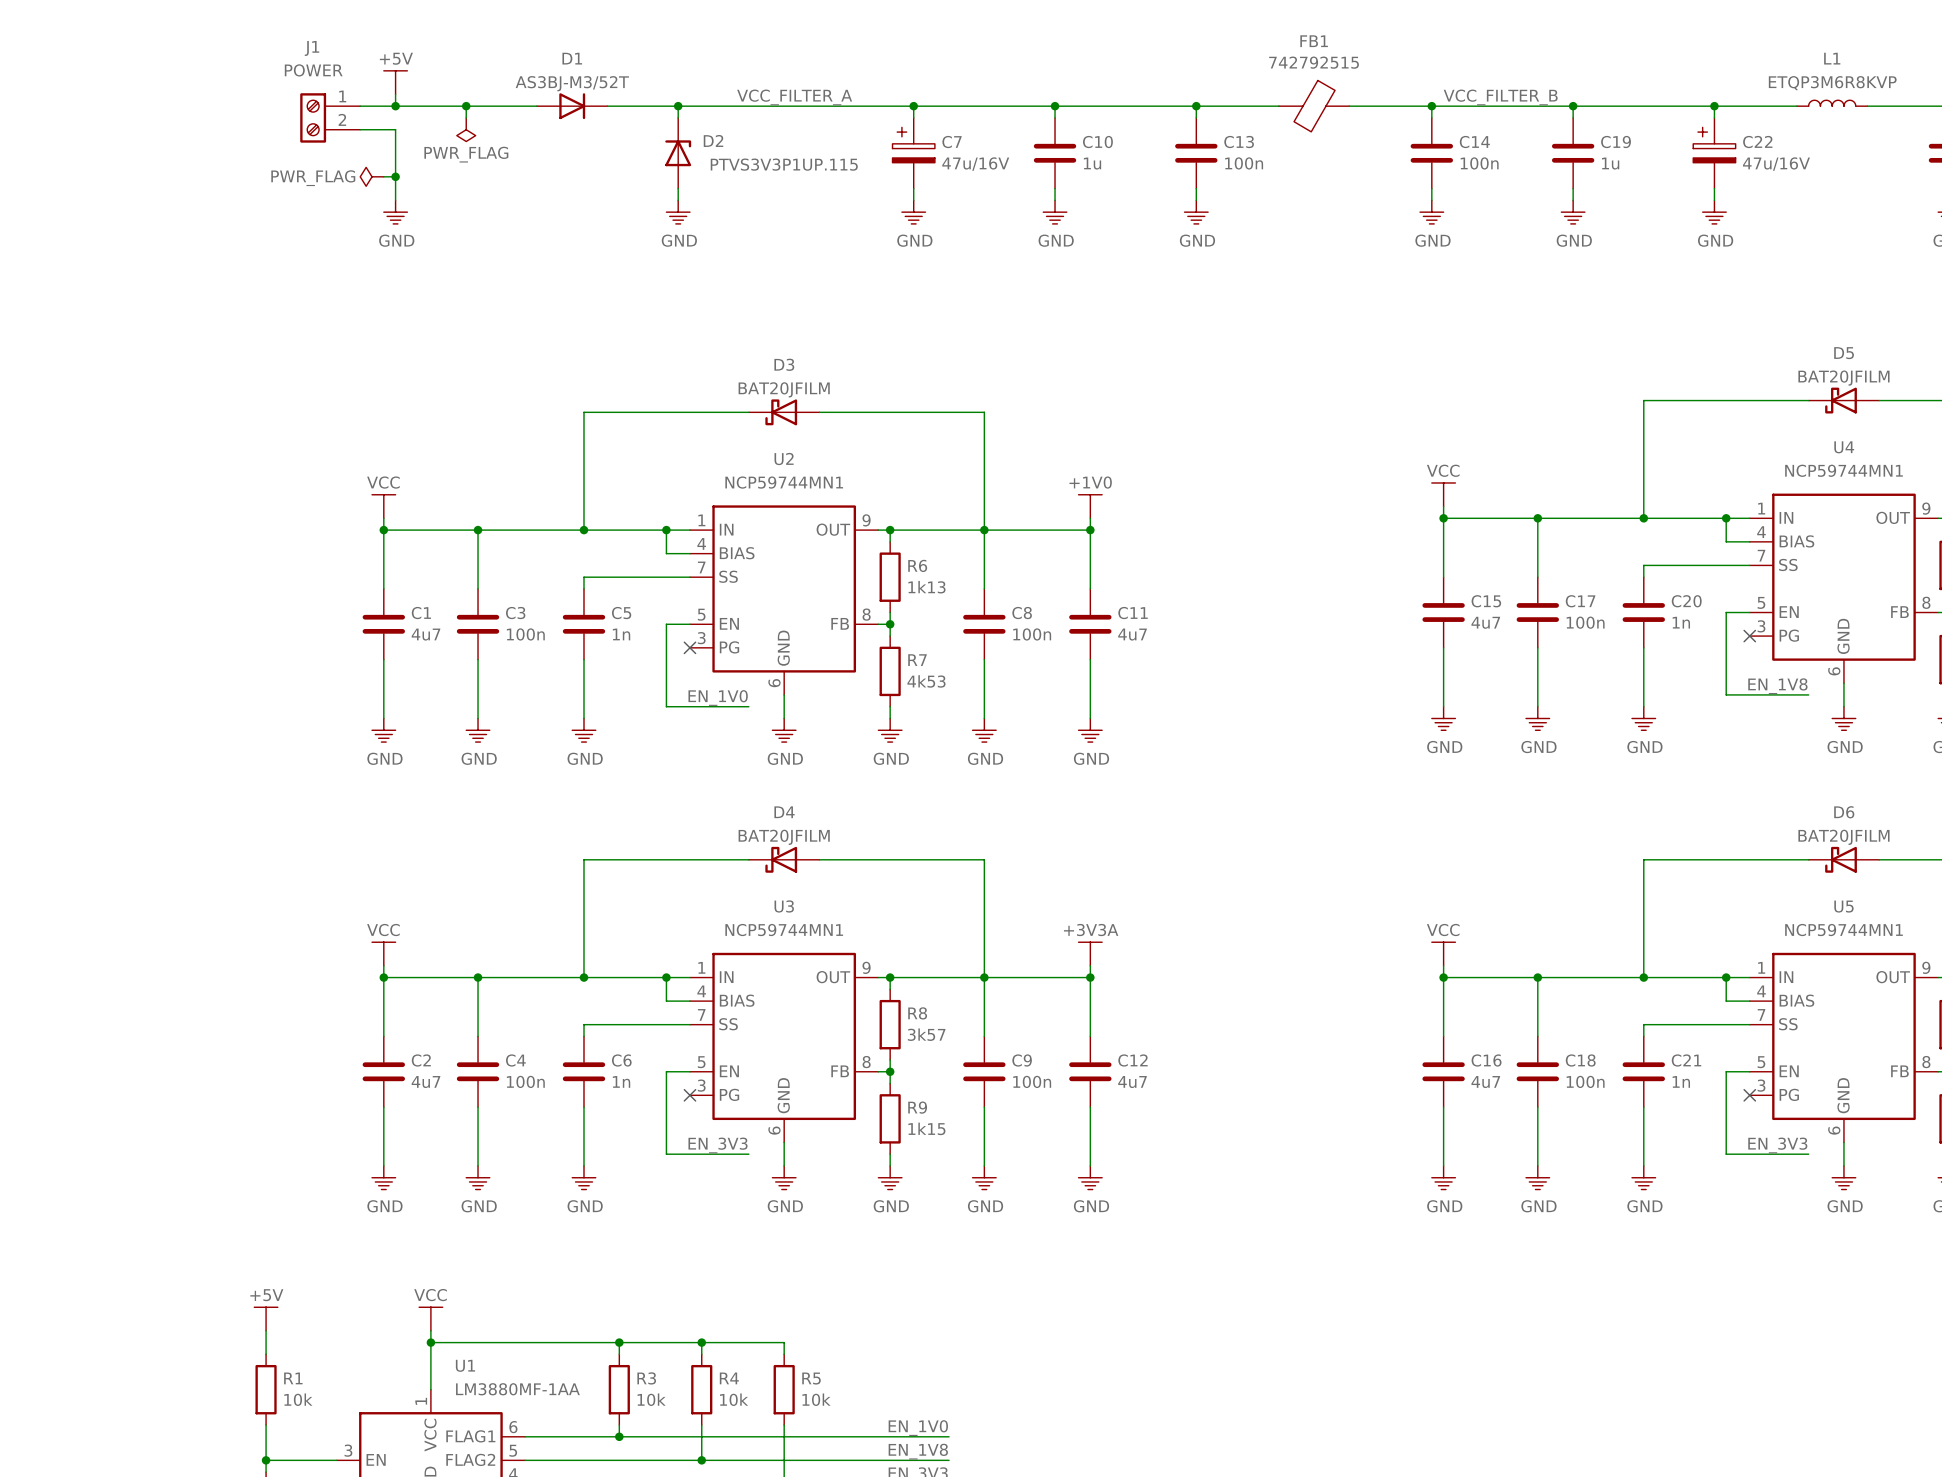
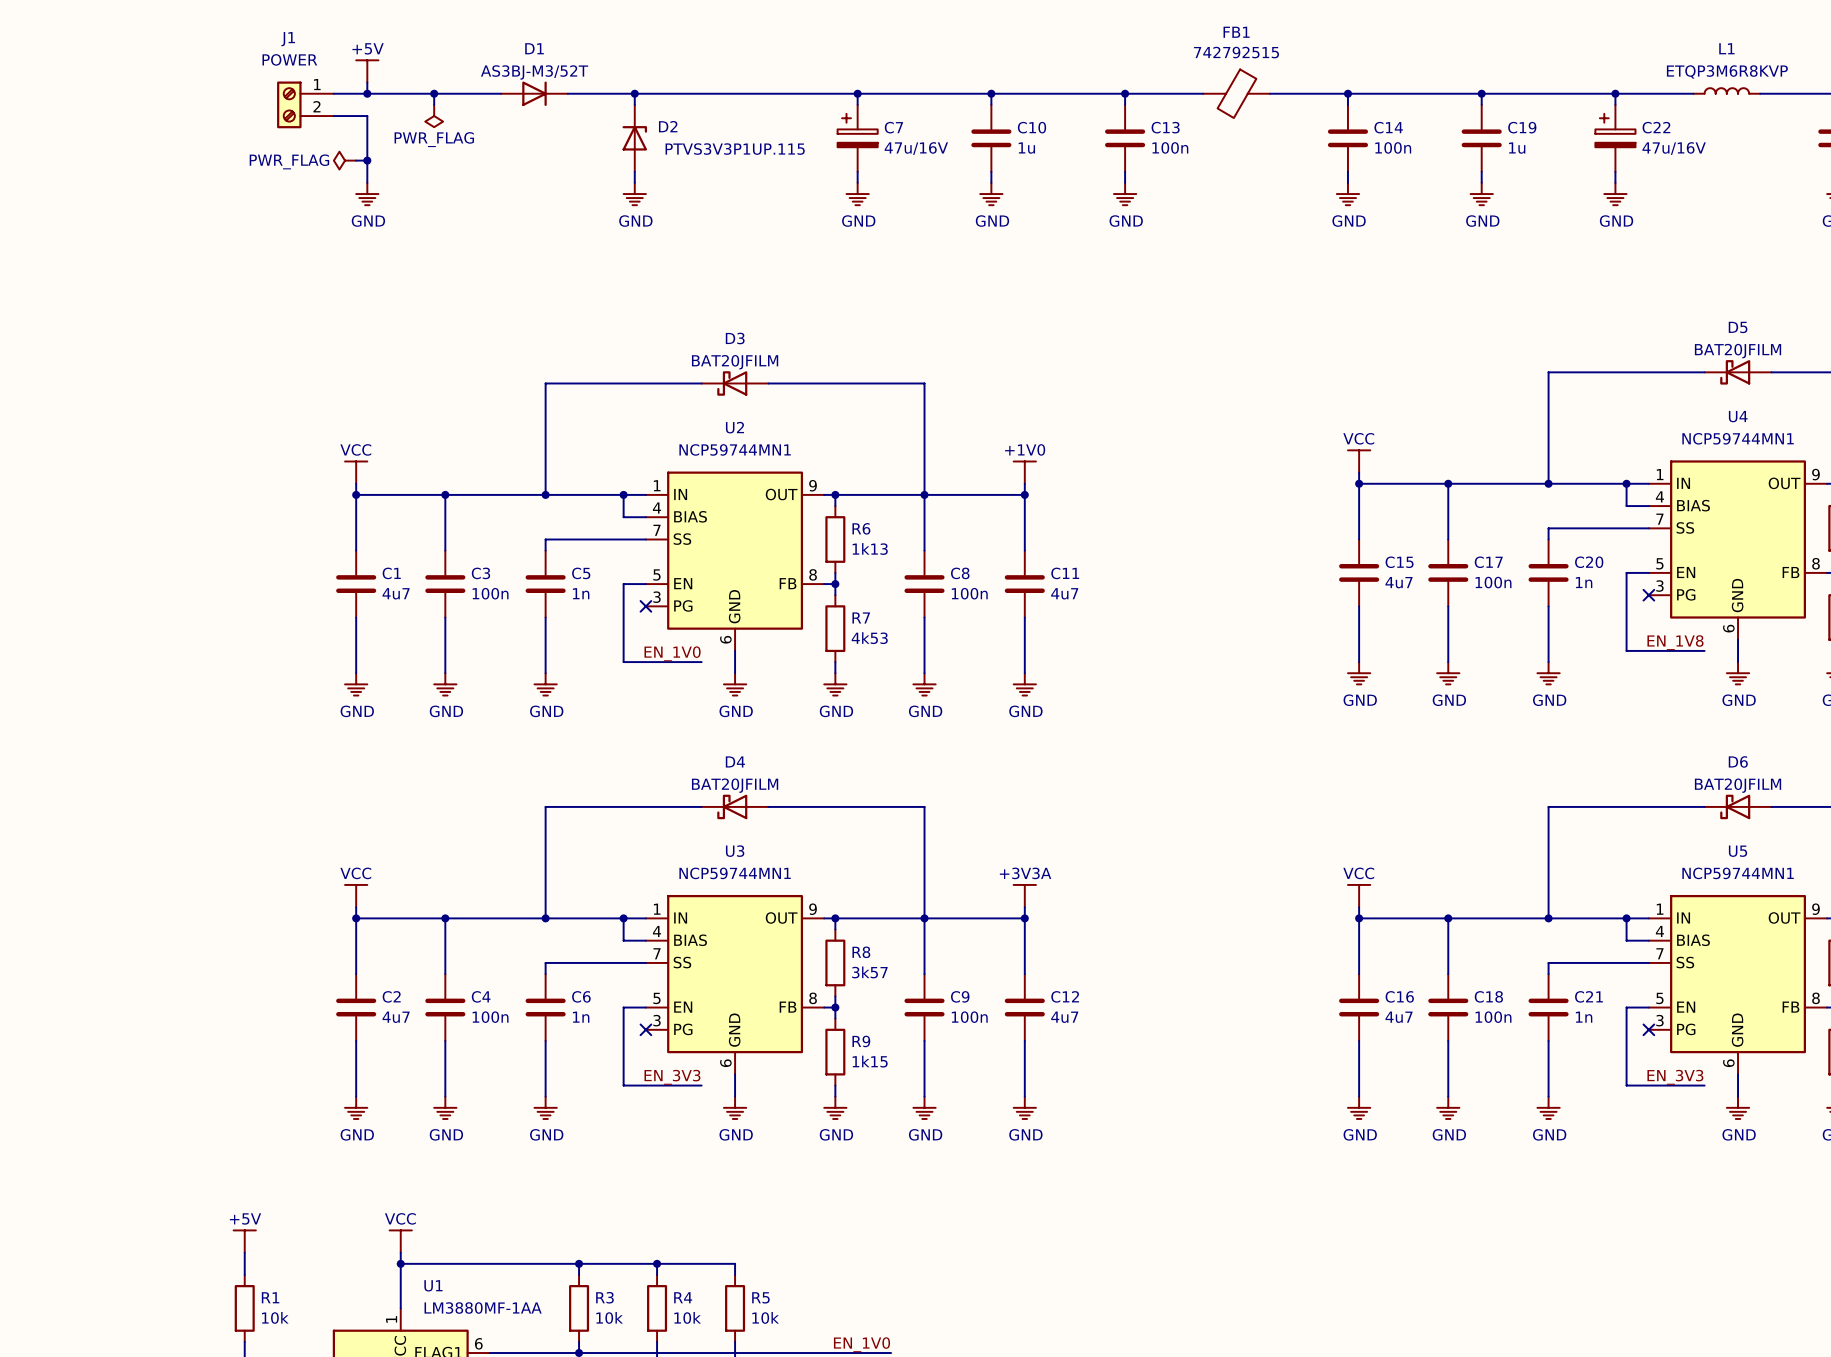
label: VCC_FILTER_A (794, 97) -> none
label: VCC_FILTER_B (1500, 97) -> none

